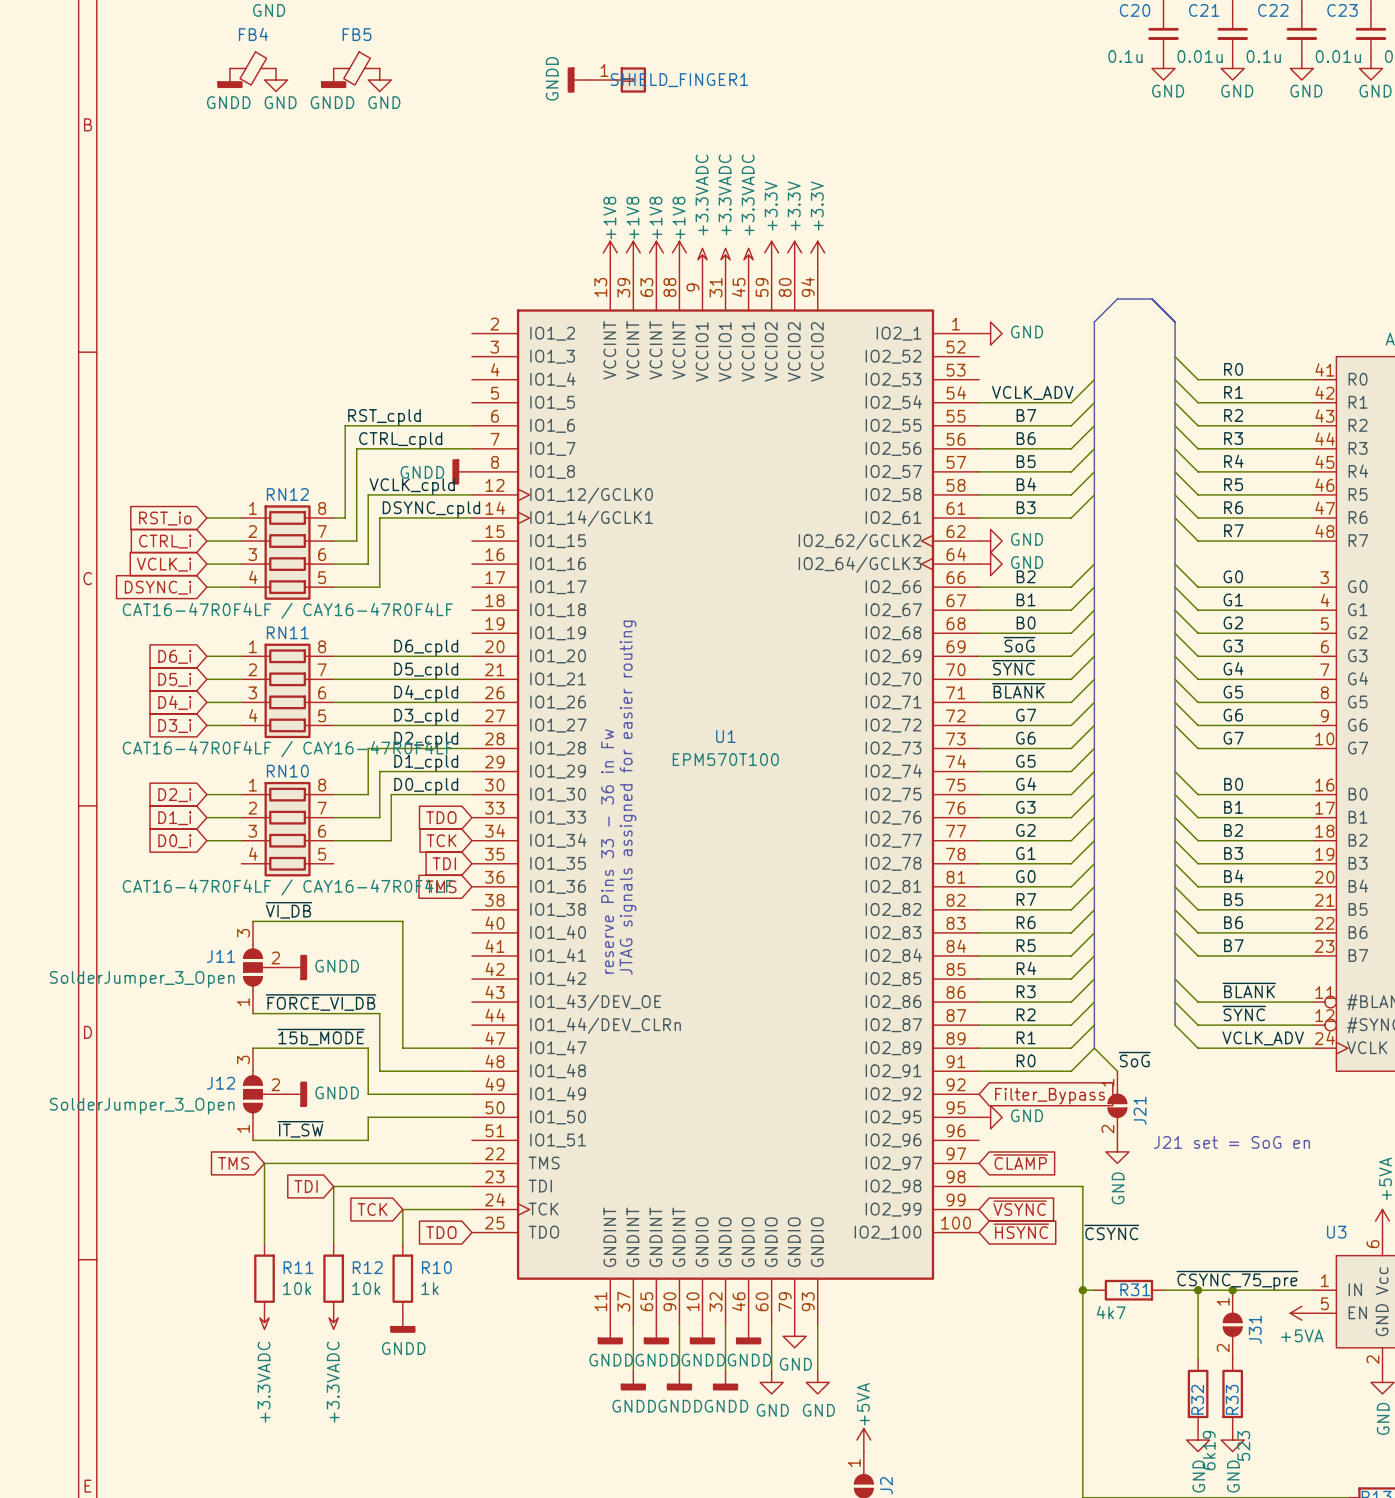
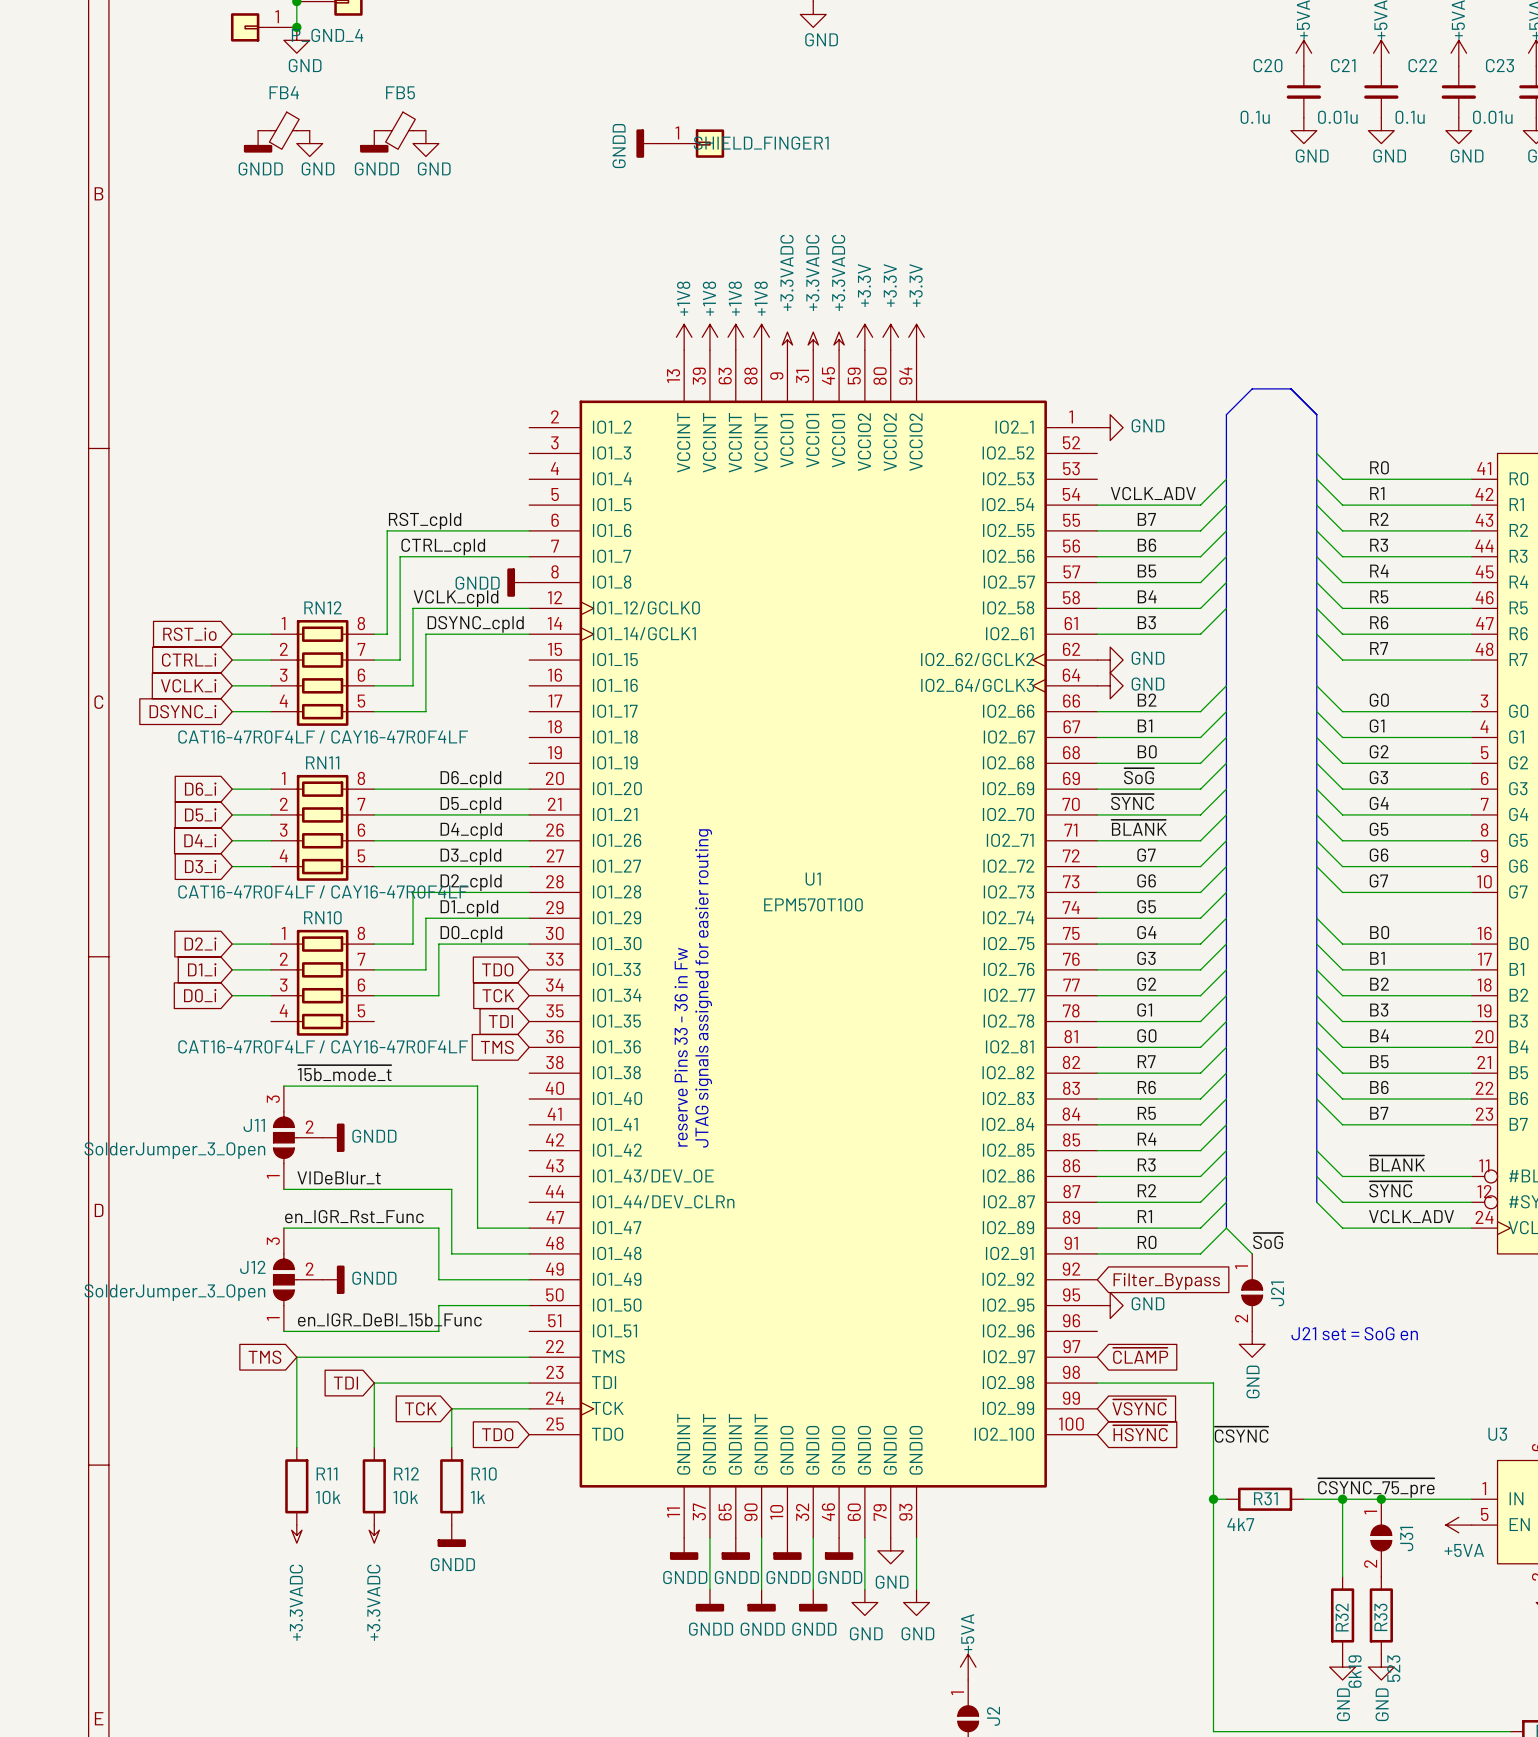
label: ~{VI_DB} (288, 910) -> ~{15b_mode_t} (344, 1073)
wire: (402, 921) (402, 1013) -> (451, 1086) (477, 1086) (477, 1228)
label: ~{FORCE_VI_DB} (321, 1002) -> VIDeBlur_t (339, 1177)
wire: (379, 1013) (379, 1071) (402, 1071) -> (425, 1189) (451, 1189)
label: ~{15b_MODE} (321, 1037) -> none
label: none -> en_IGR_Rst_Func (354, 1216)
wire: (368, 1048) (368, 1094) (391, 1094) -> (413, 1228) (438, 1228) (438, 1279)
wire: (402, 1048) (425, 1048) -> (451, 1228) (451, 1253)
wire: (391, 1117) (368, 1117) (368, 1140) -> (438, 1305) (438, 1331) (413, 1331)
label: ~{IT_SW} (300, 1129) -> none
label: none -> en_IGR_DeBl_15b_Func (389, 1319)

